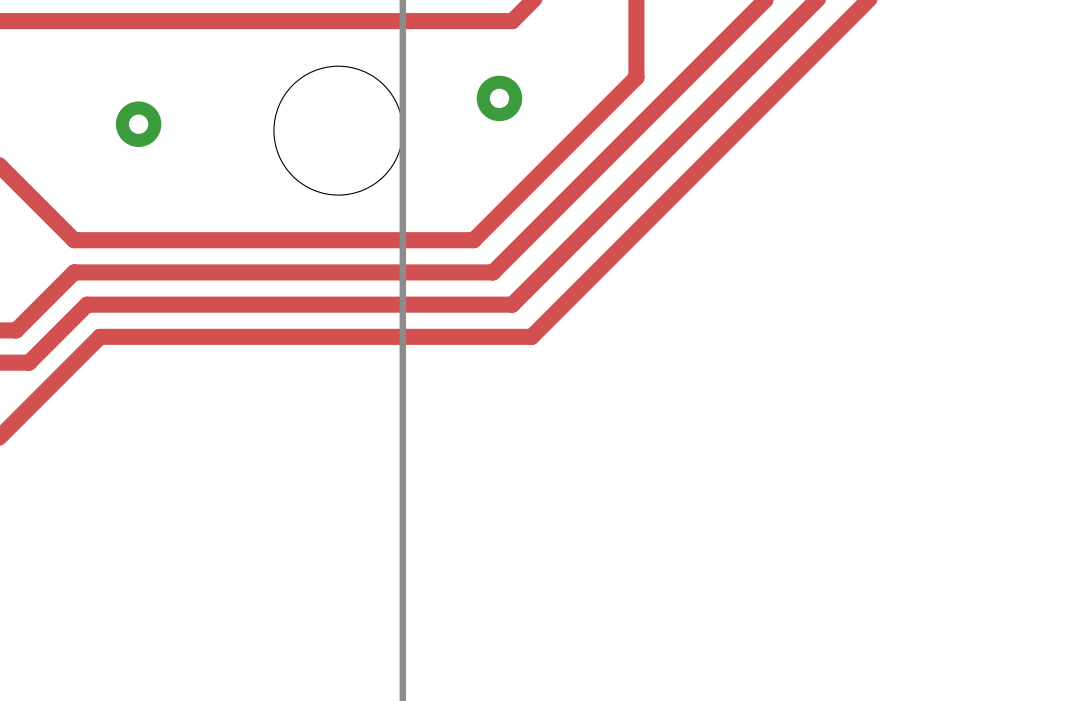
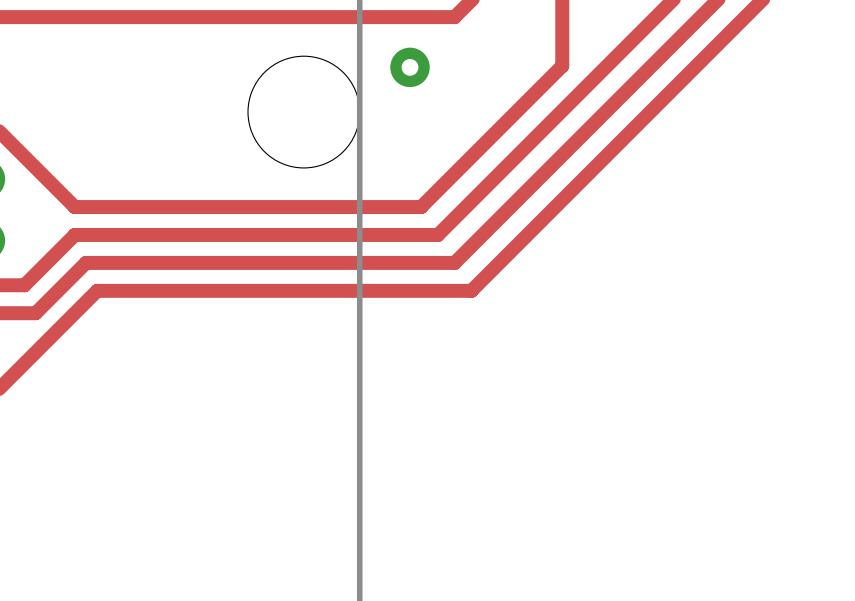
via position: (499, 98) -> (410, 67)
via: (138, 124) -> none

